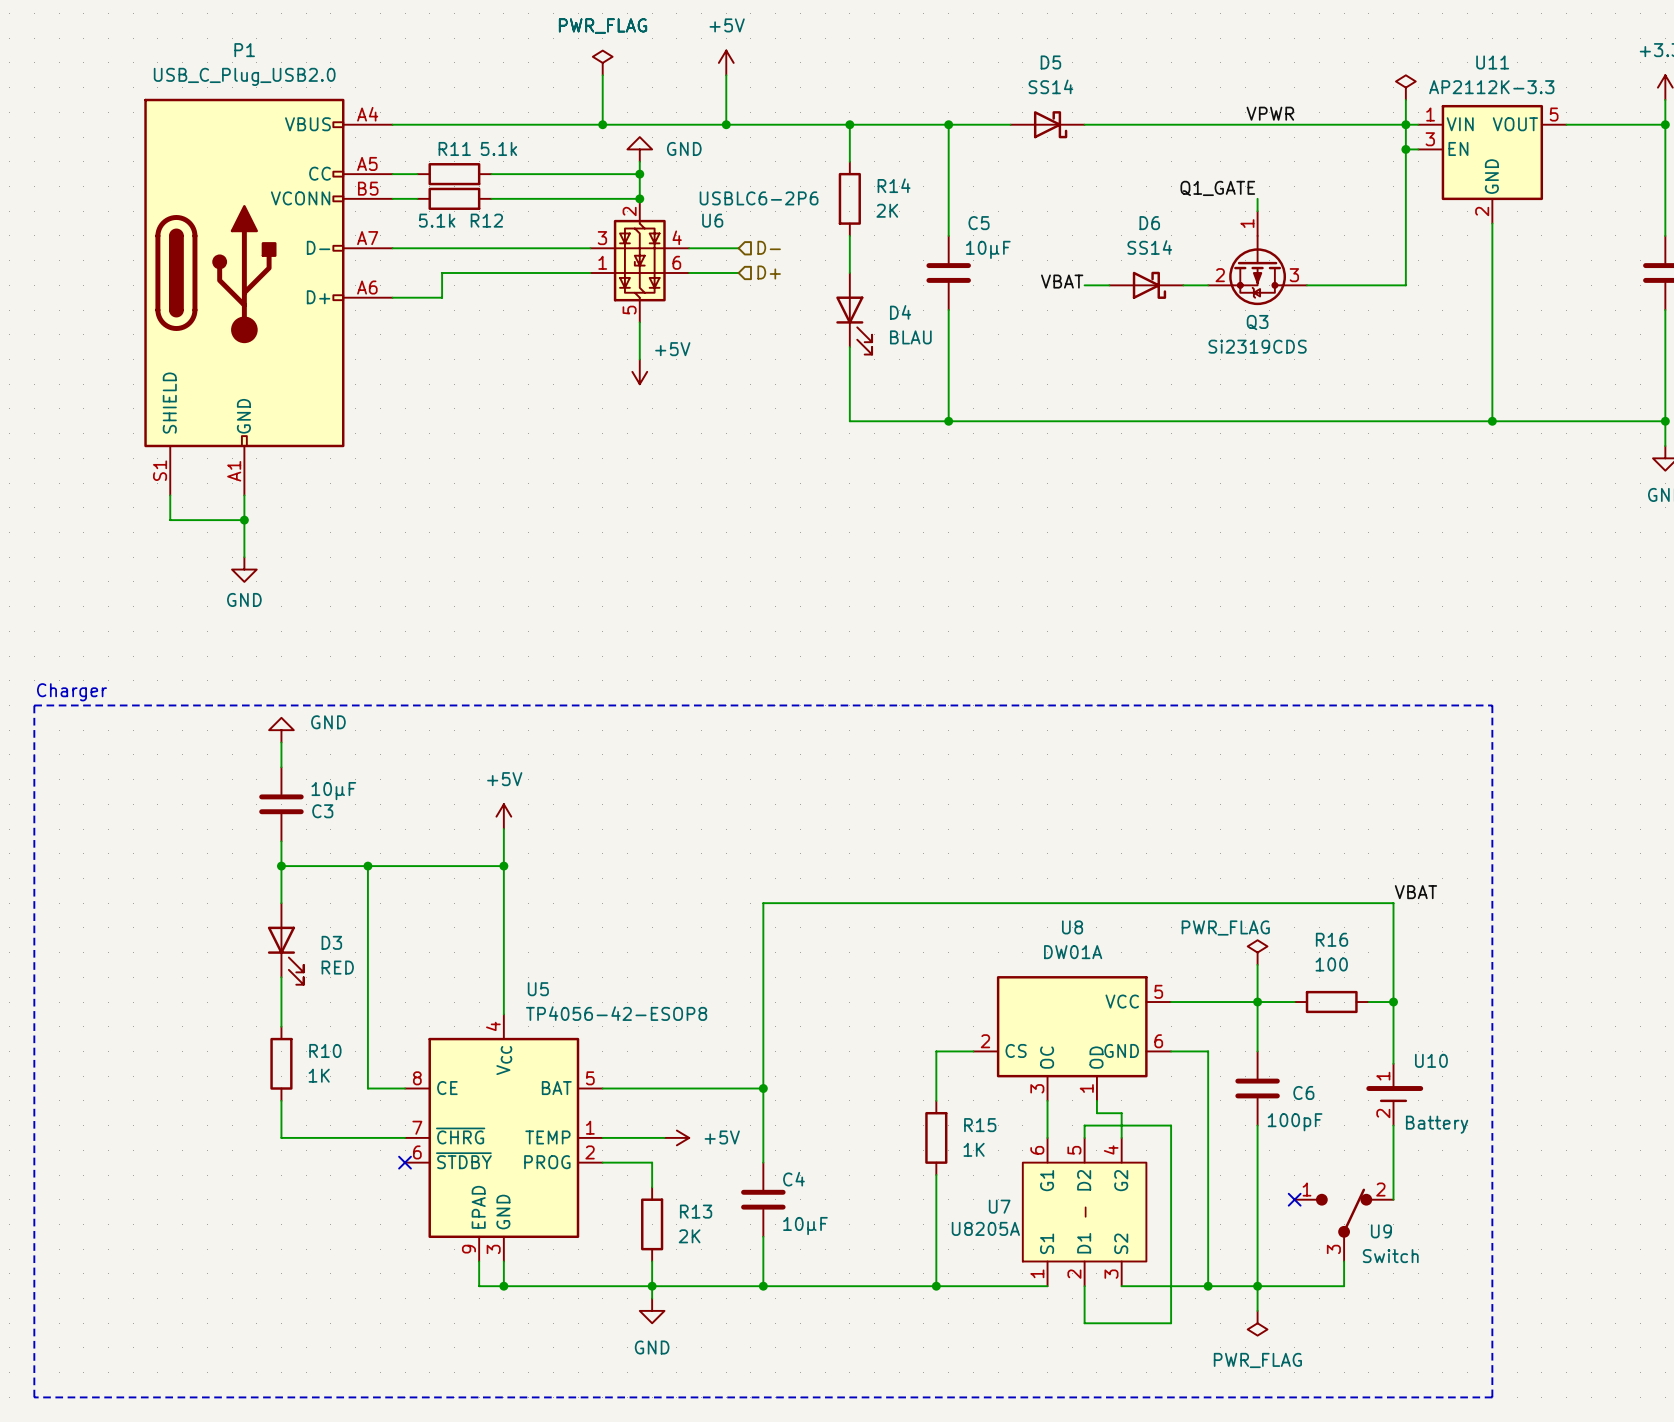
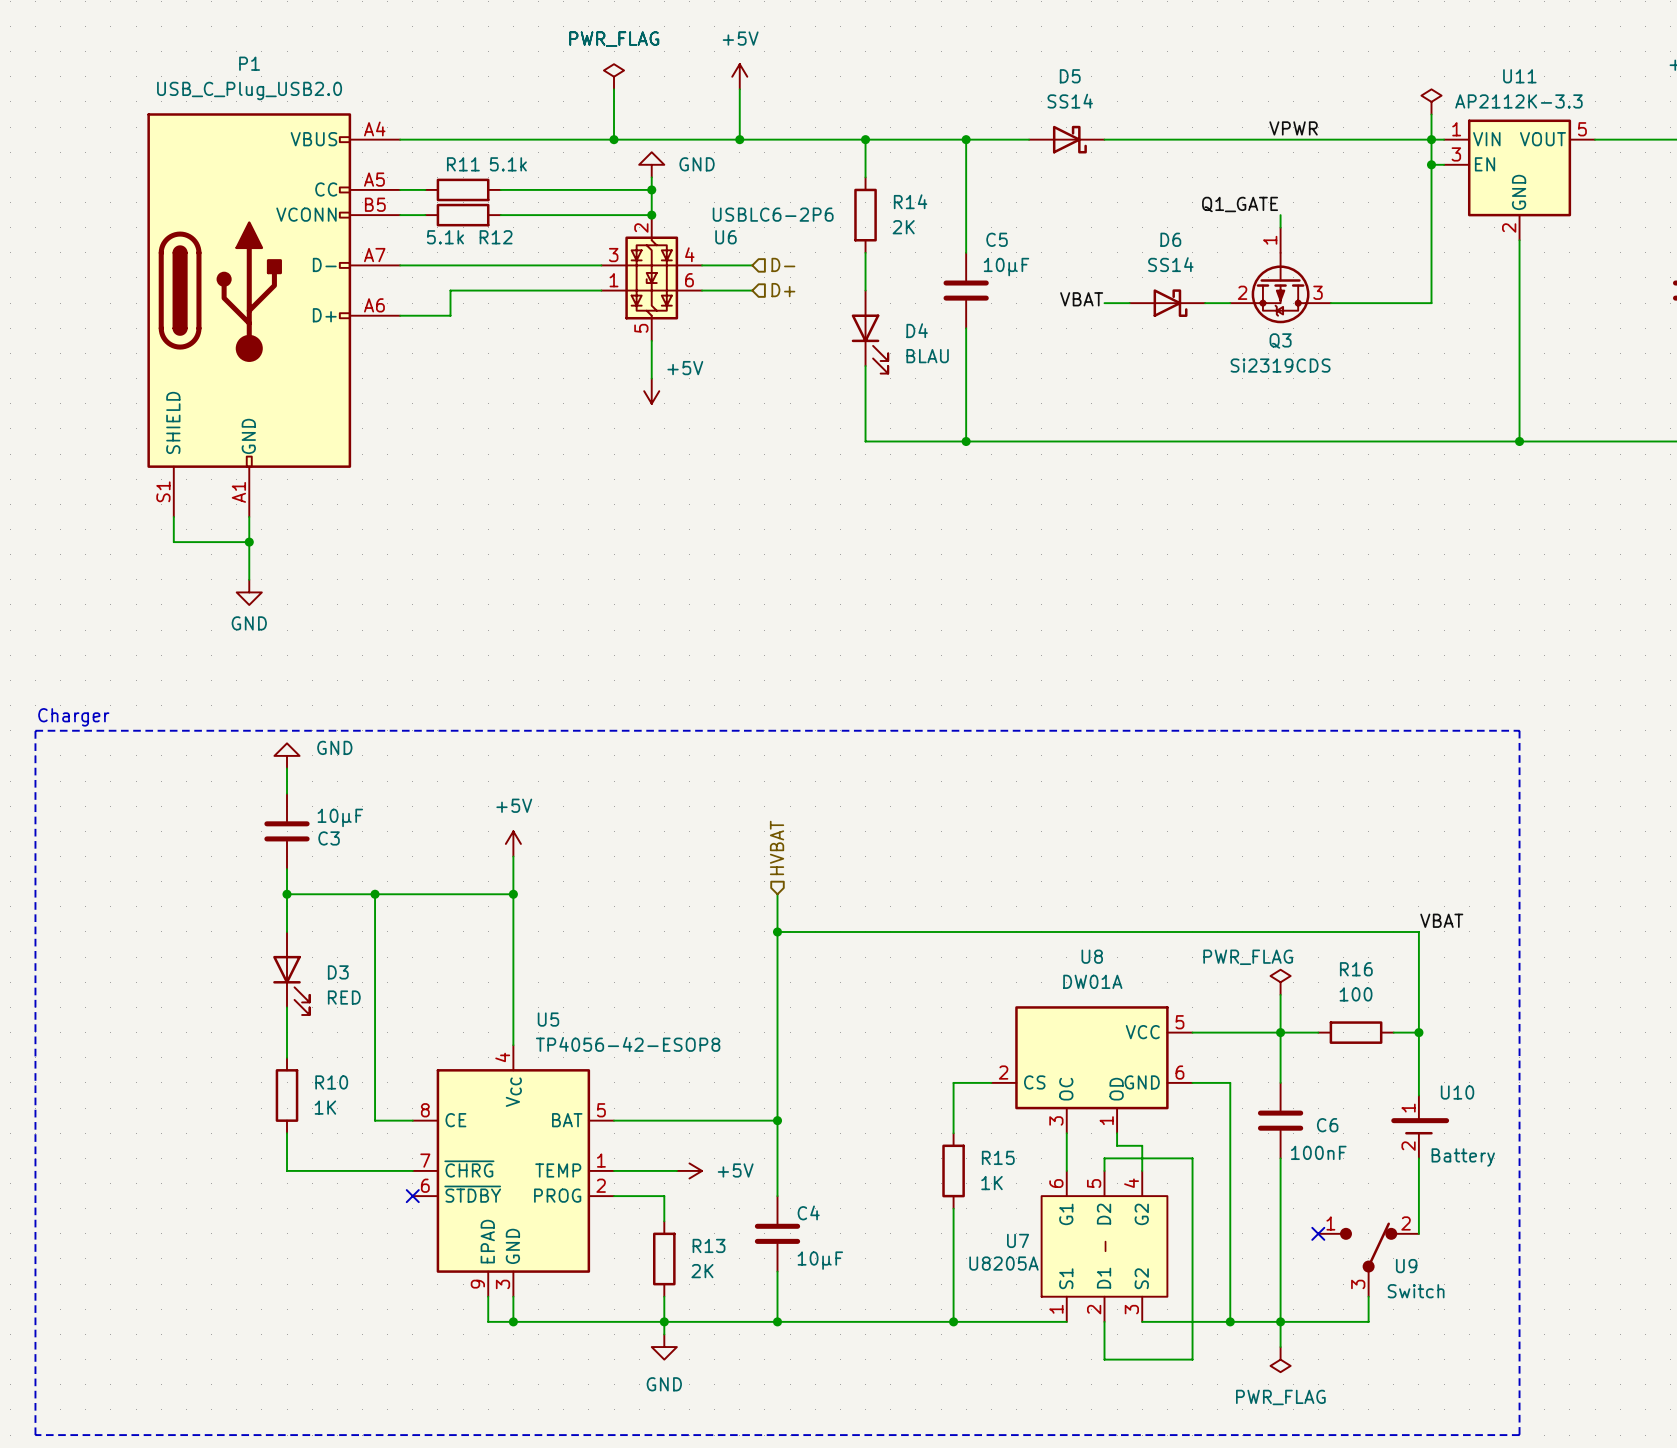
hierarchical label: none -> HVBAT (777, 847)
wire: none -> (777, 894) (777, 931)
junction: none -> (777, 931)
C6 value: 100pF (1295, 1122) -> 100nF (1318, 1152)

